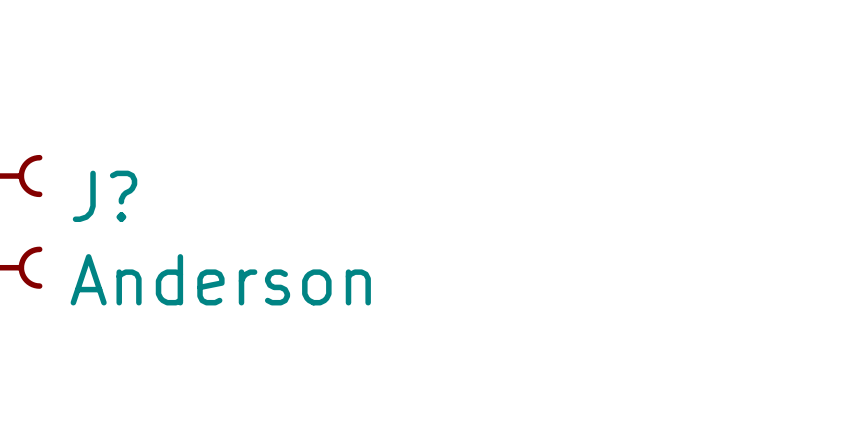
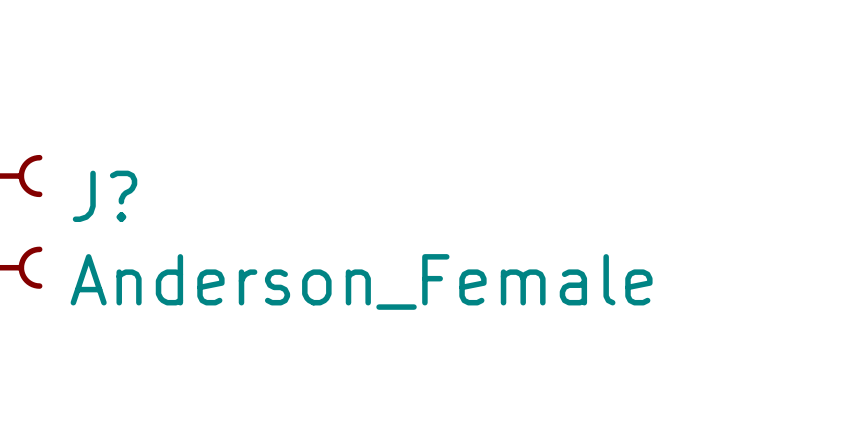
J? value: Anderson (220, 279) -> Anderson_Female (361, 281)

